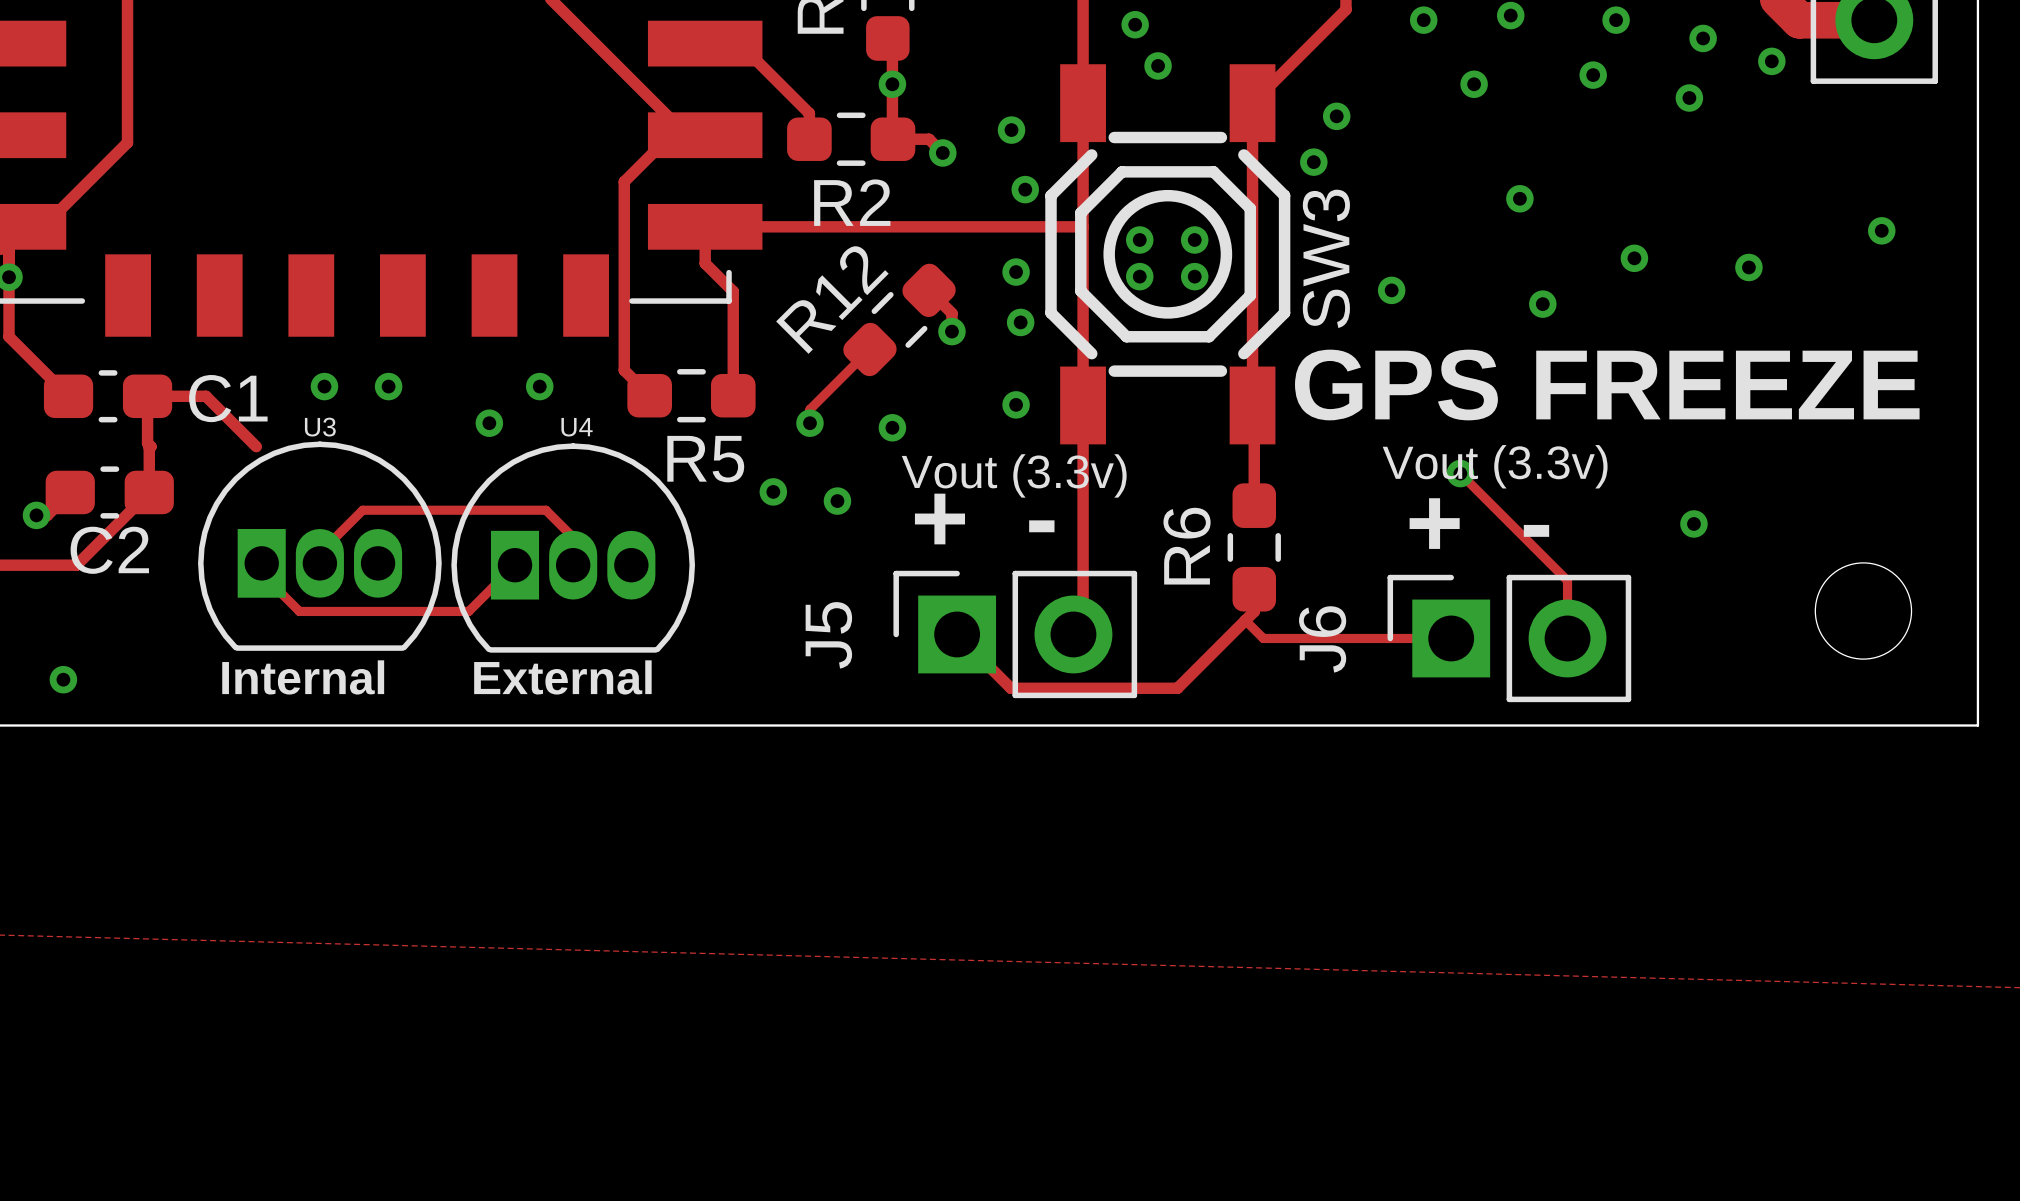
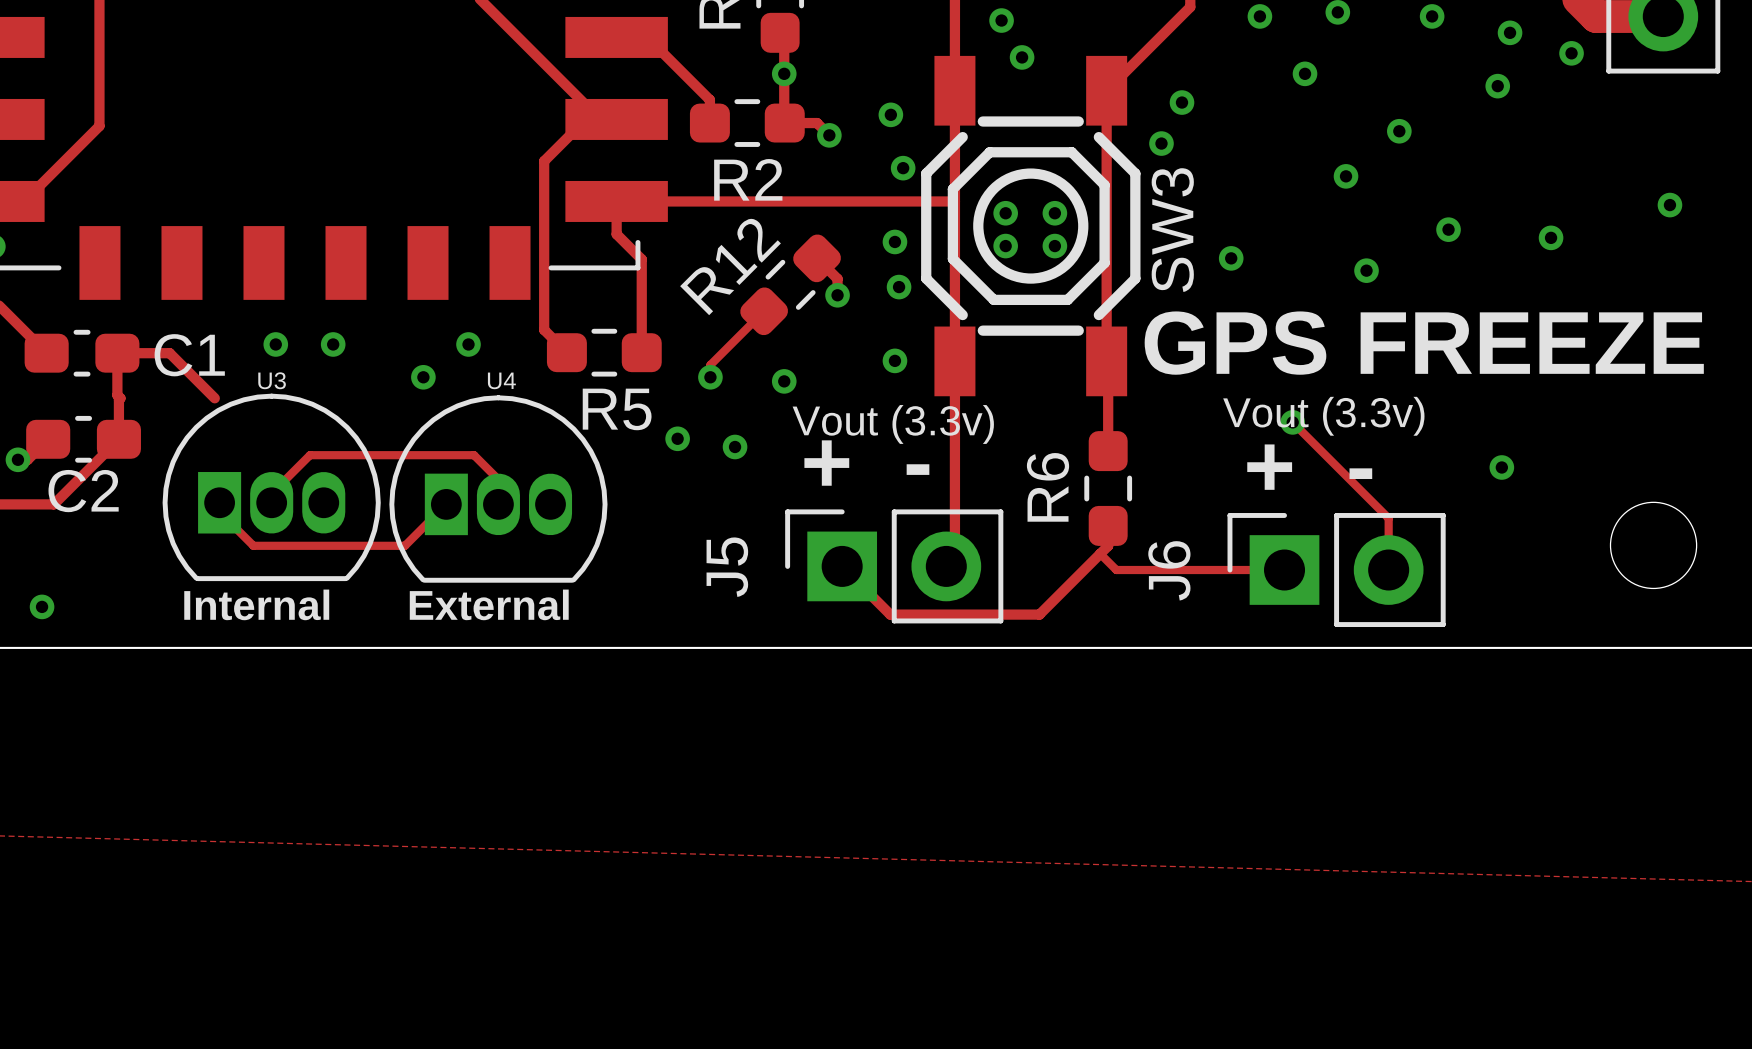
via position: (1593, 75) -> (1399, 131)

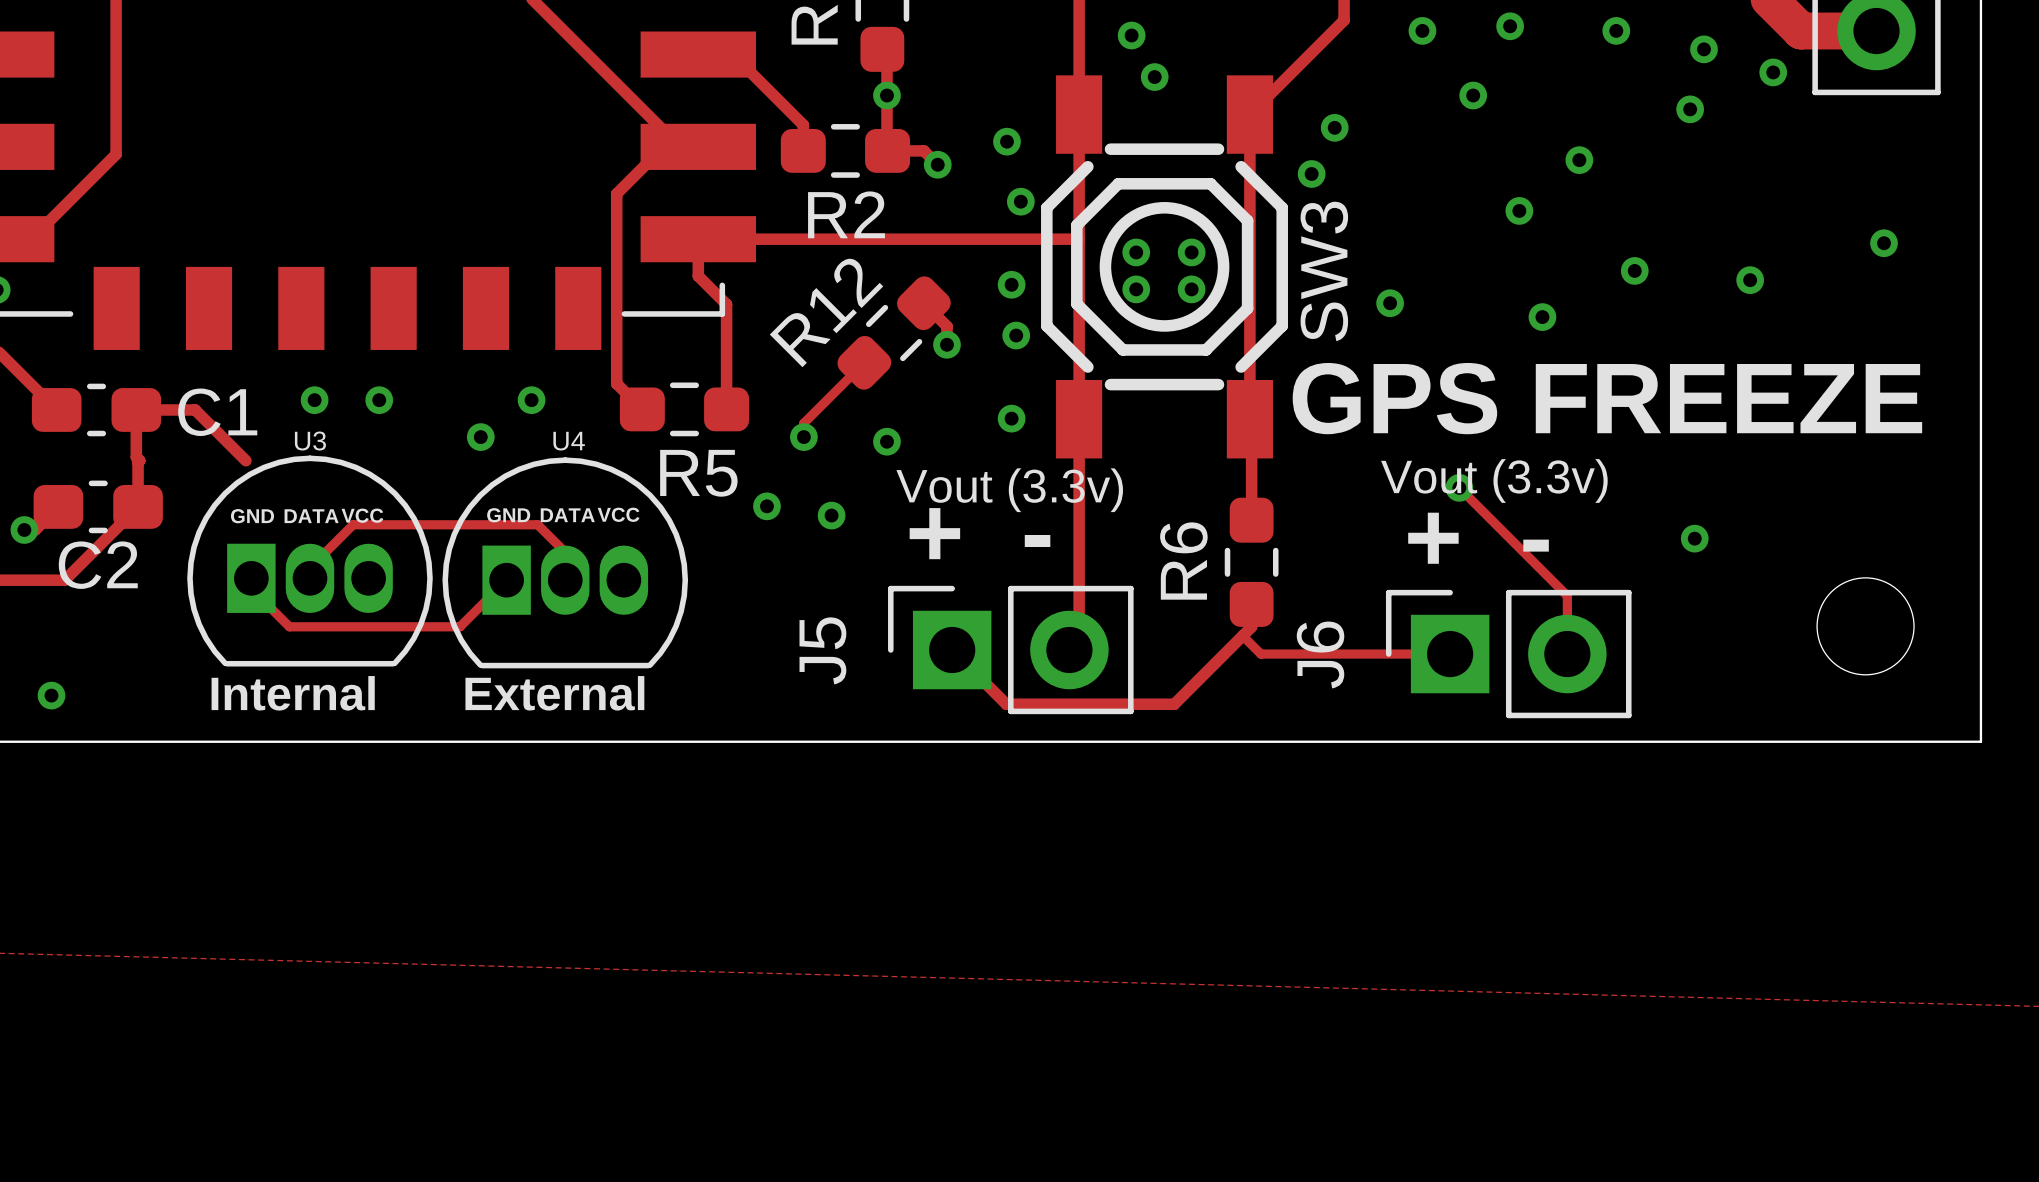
text: none -> GND (508, 515)
text: none -> DATA (567, 515)
text: none -> VCC (618, 514)
text: none -> GND (252, 516)
text: none -> DATA (311, 516)
text: none -> VCC (362, 515)

